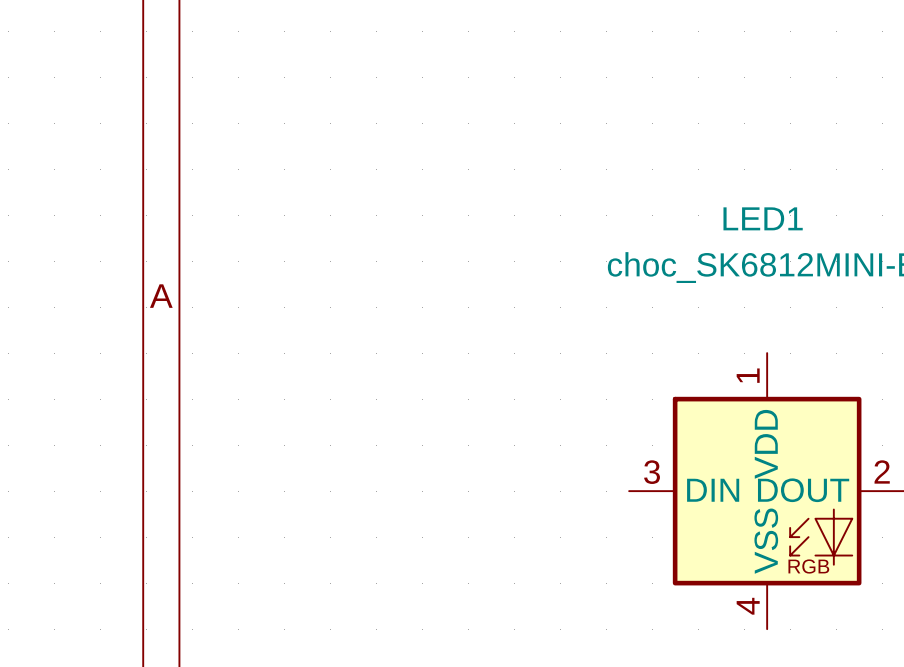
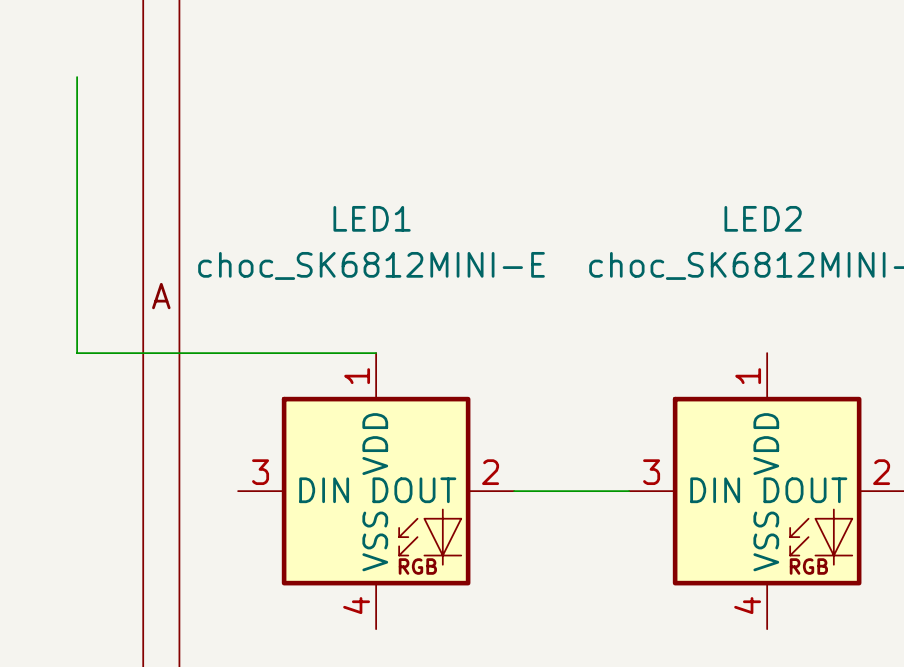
wire: none -> (77, 77) (77, 353) (376, 353)
LED1 name: LED1 (763, 218) -> LED2 (763, 218)
LED1: none -> choc_SK6812MINI-E (376, 491)
wire: none -> (514, 491) (629, 491)

